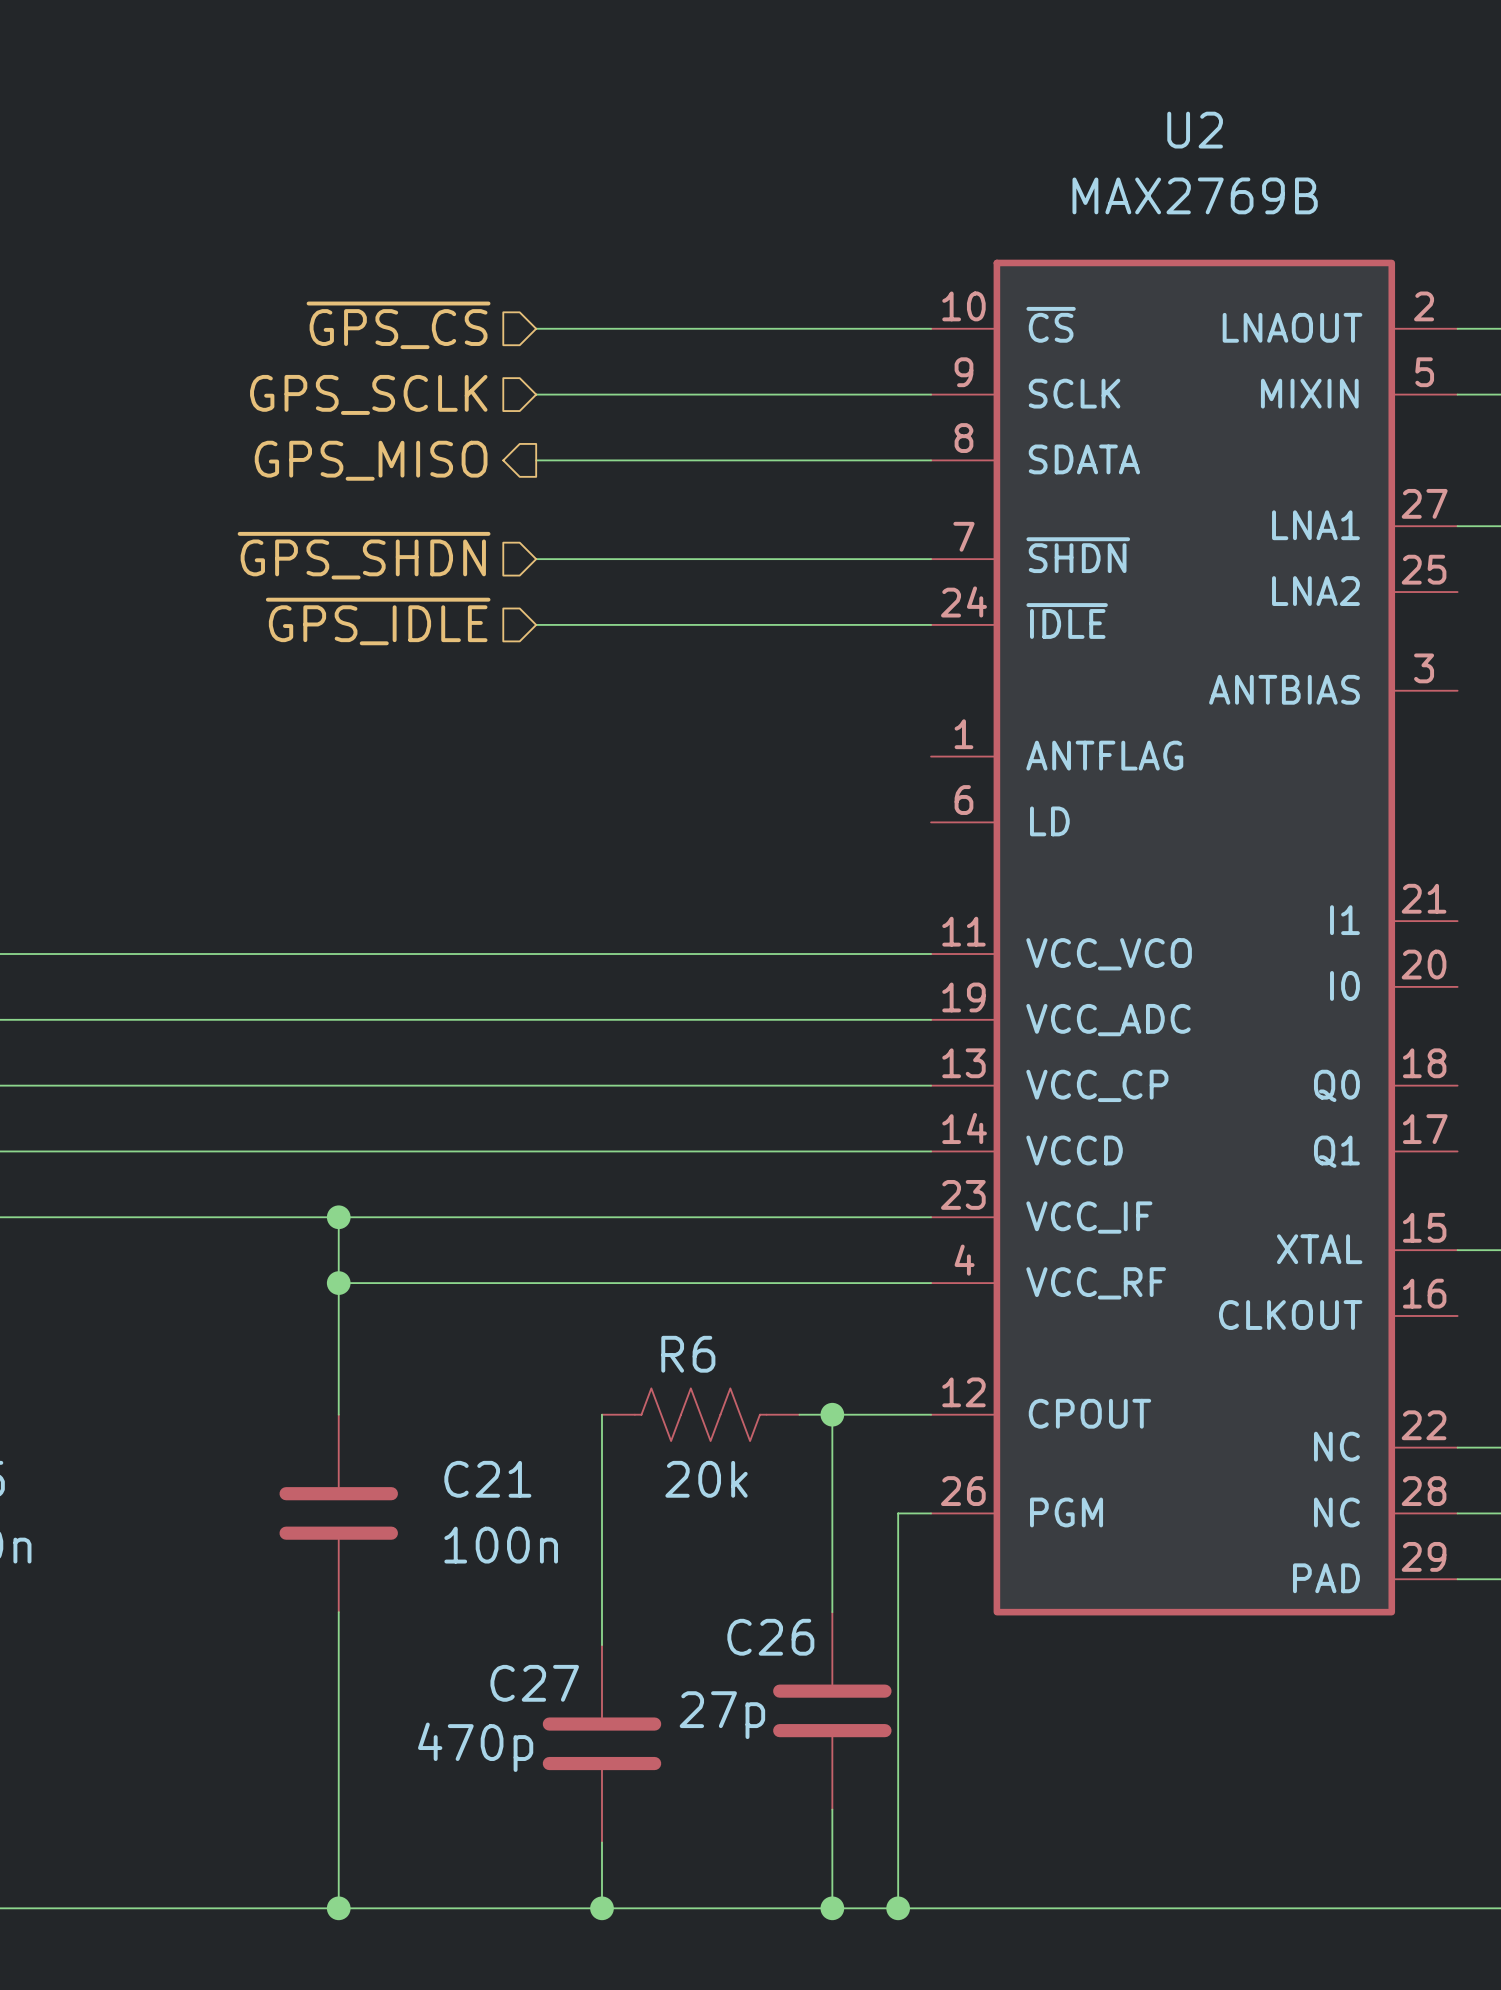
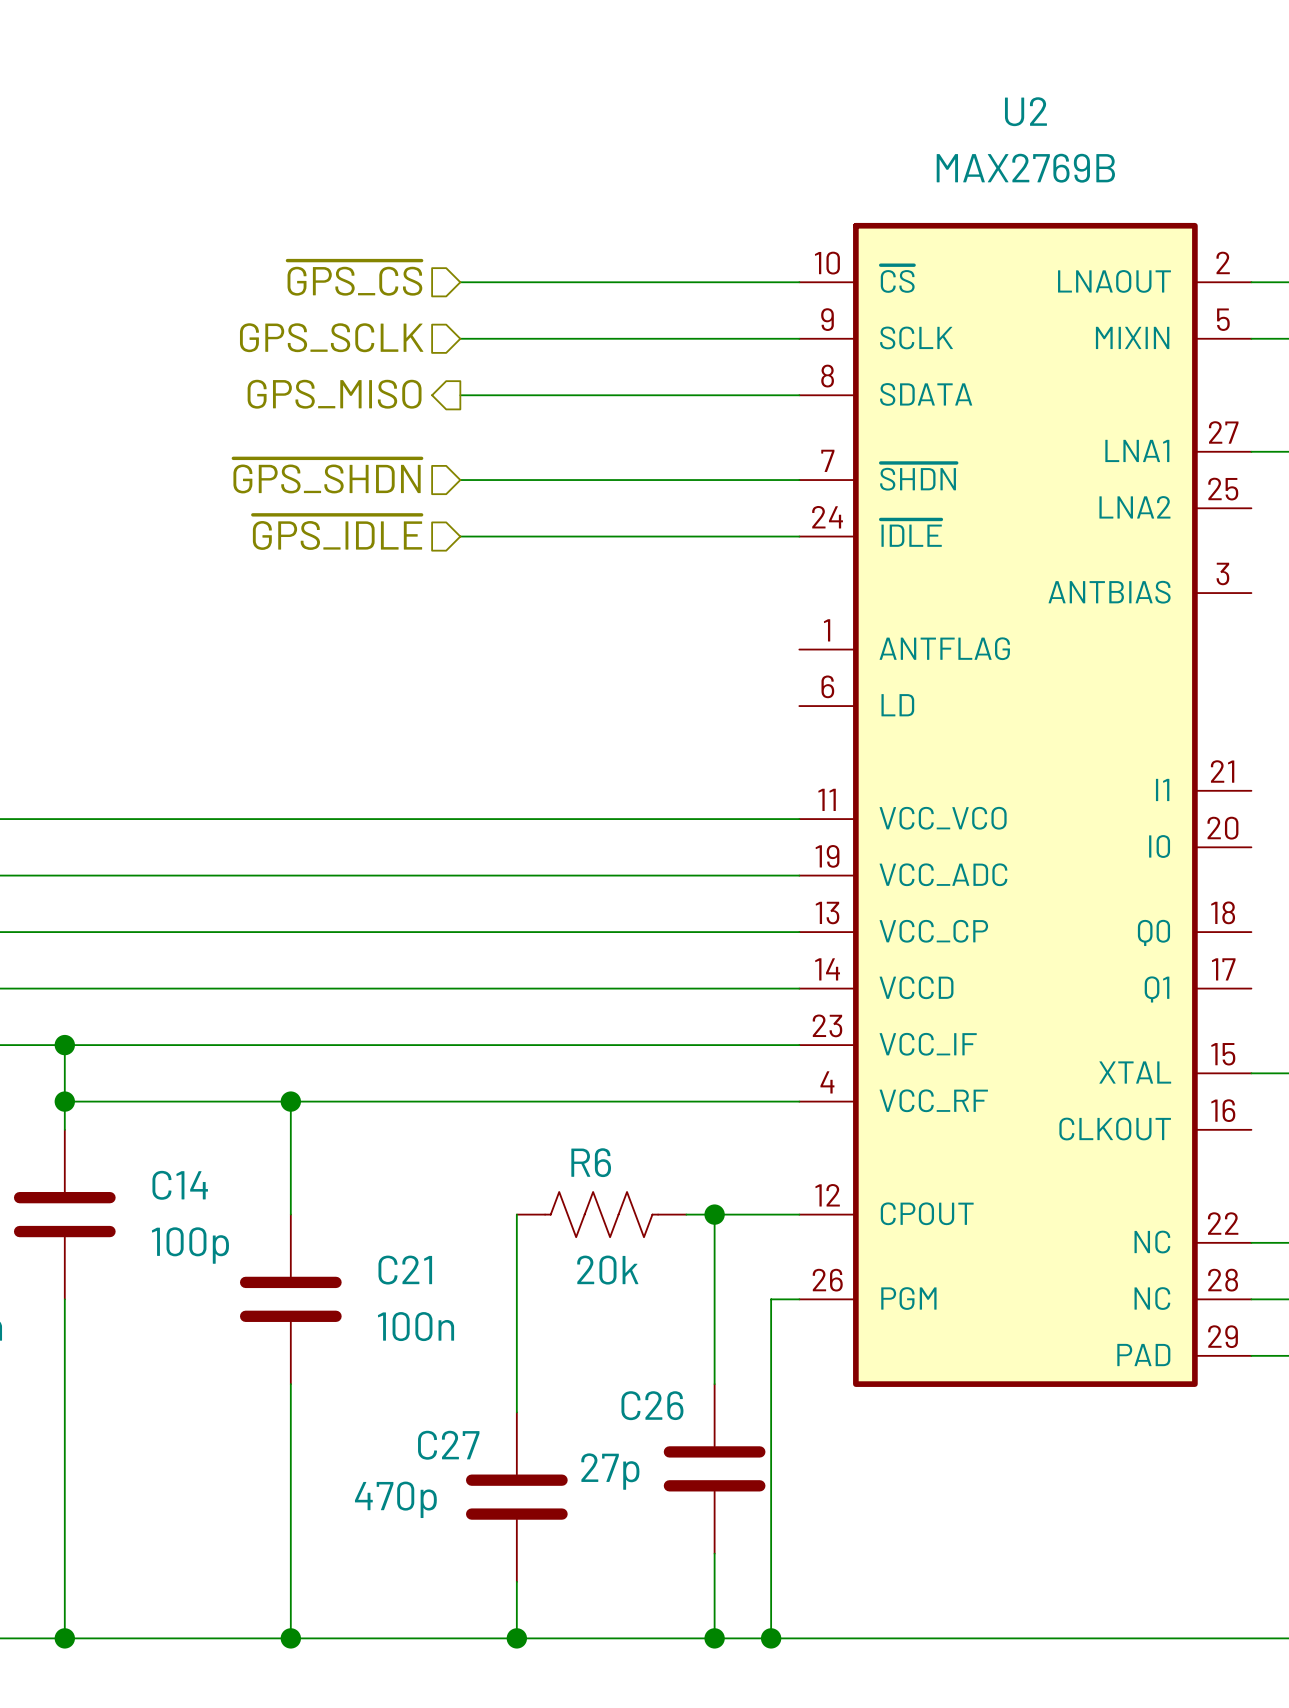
wire: none -> (64, 1045) (64, 1129)
junction: none -> (64, 1045)
wire: (338, 1217) (338, 1283) -> (64, 1101) (290, 1101)
junction: (338, 1217) -> none
junction: none -> (64, 1101)
C14: none -> 100p (64, 1214)
wire: none -> (64, 1299) (64, 1638)
junction: none -> (64, 1638)

